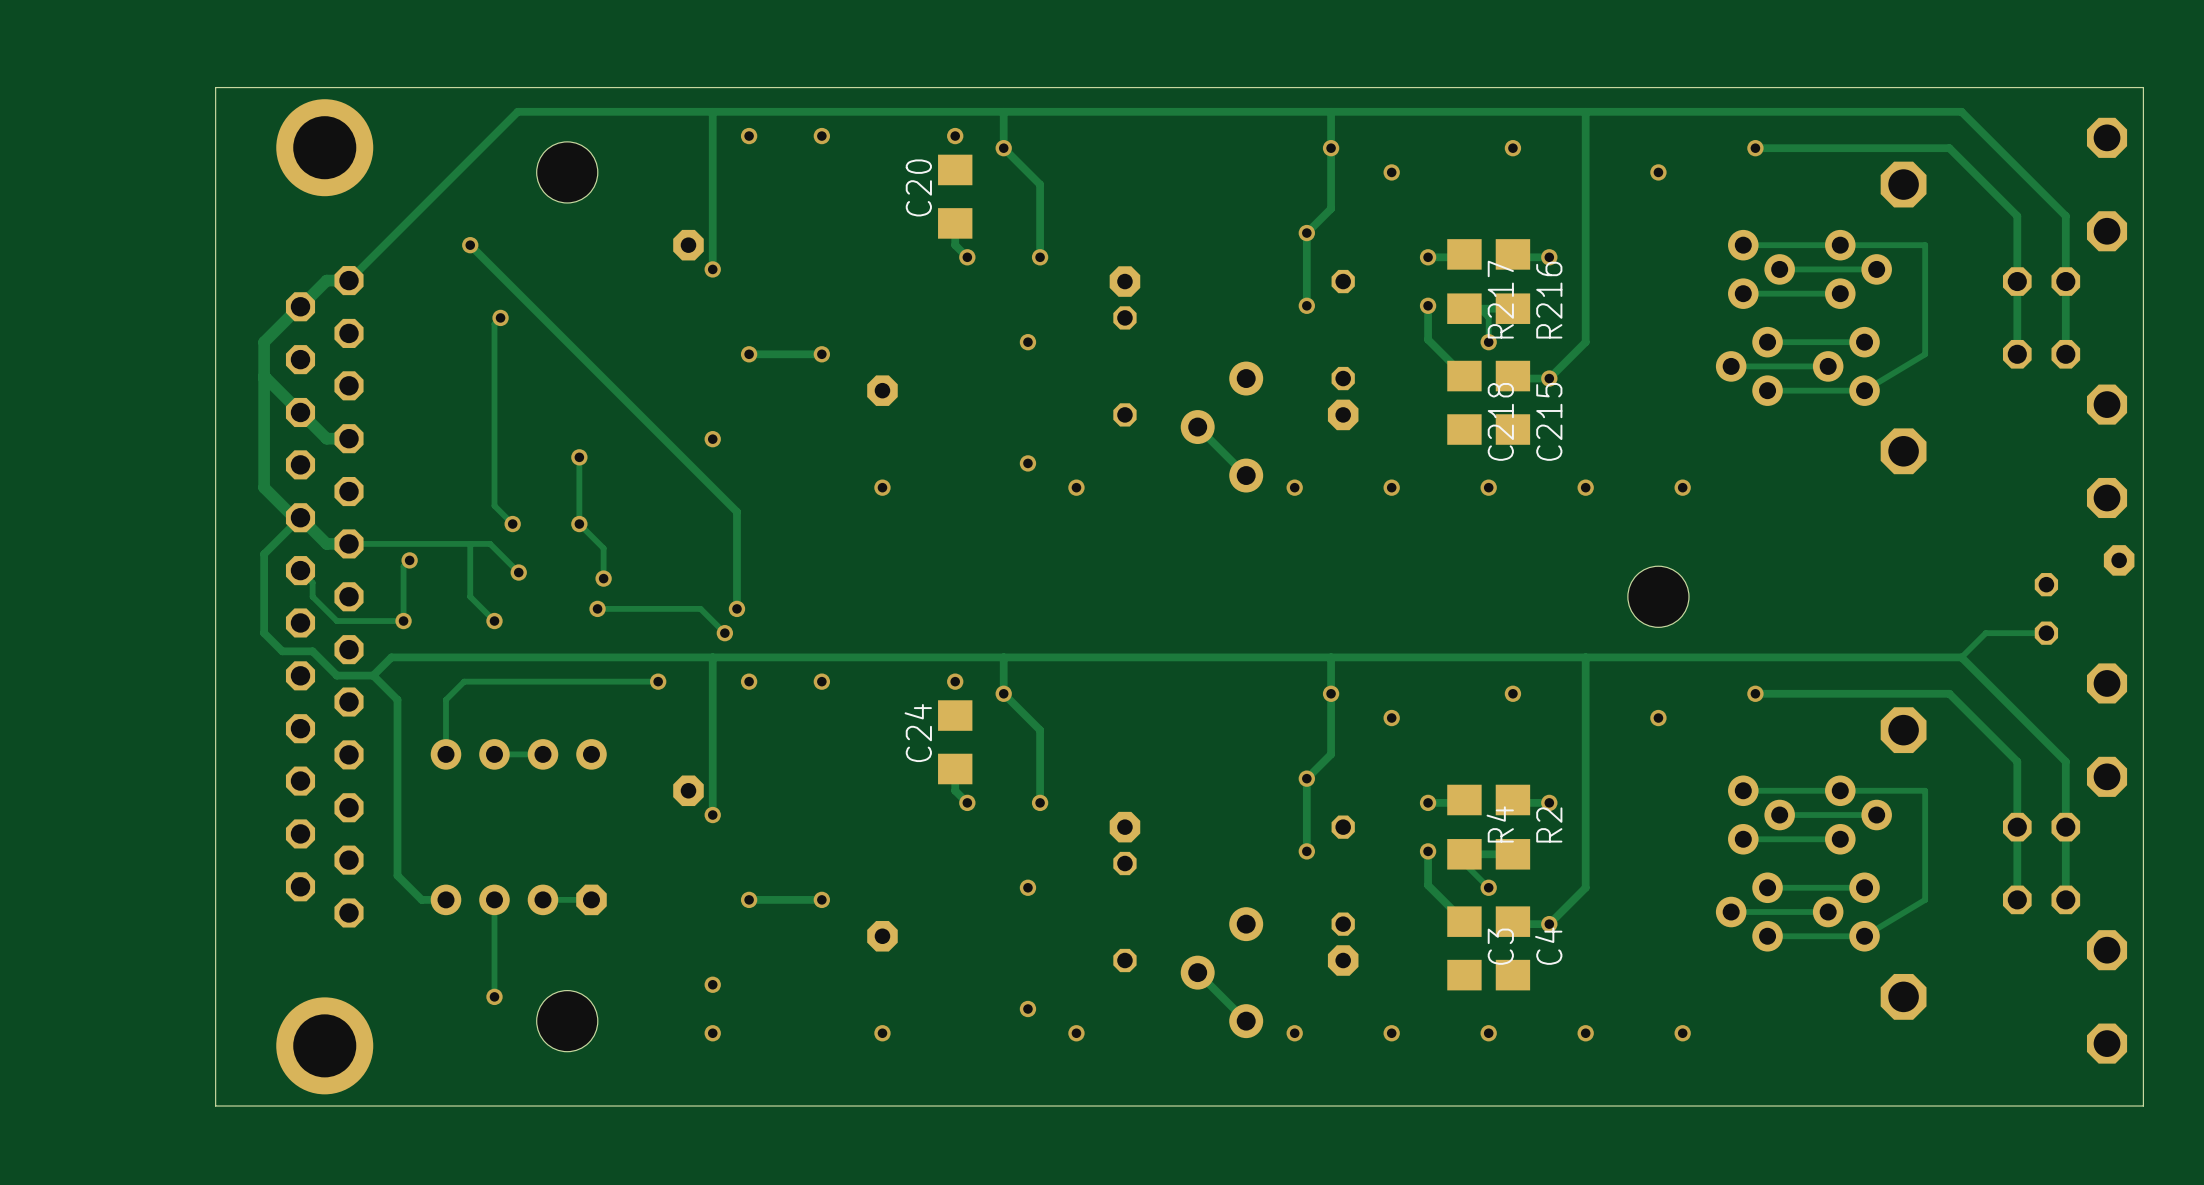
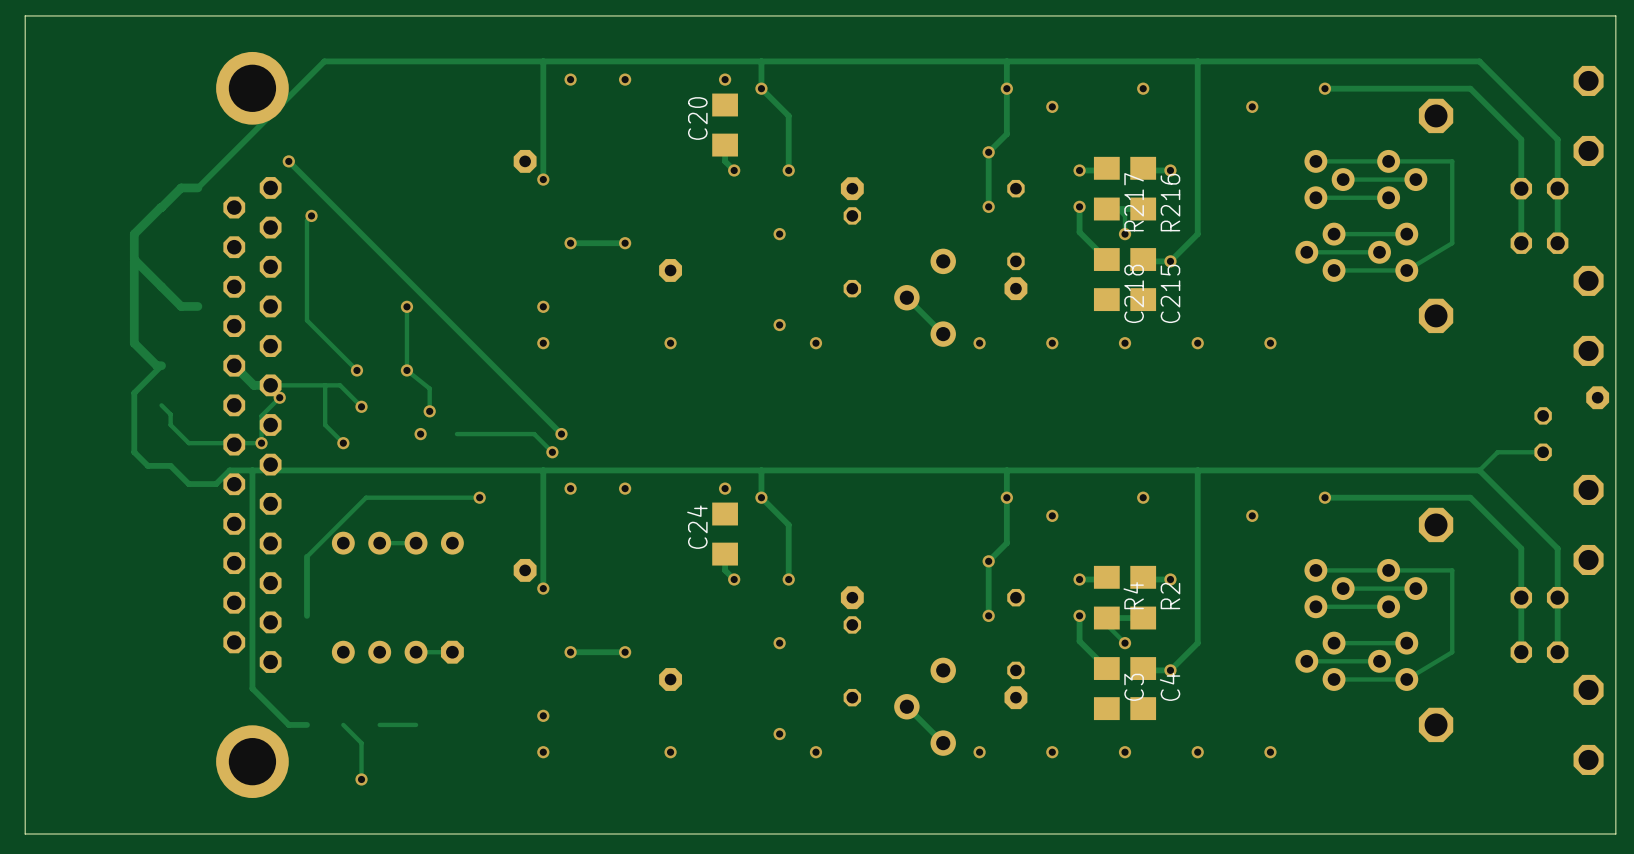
board edge: (2143, 87) (215, 87) (215, 1106) (2143, 1106) -> (1615, 43) (1615, 15) (25, 15) (25, 834) (1615, 834) (1615, 806)
track: (517, 111) (349, 280) (326, 280) (264, 342) (264, 376) (326, 438) (349, 438) -> (397, 61) (324, 61) (197, 187) (181, 187) (134, 234) (134, 259) (181, 306) (197, 306)
hole: (567, 172) -> none
via: none -> (288, 161)
track: (470, 245) (736, 511) (736, 608) -> (288, 161) (561, 434)
via: (470, 245) -> none
track: none -> (311, 215) (306, 220) (306, 320) (356, 370)
via: none -> (311, 215)
track: (500, 317) (494, 323) (494, 505) (512, 524) -> none
via: (500, 317) -> none
track: (265, 377) (264, 487) (294, 517) (300, 517) (264, 554) (264, 633) (282, 651) (312, 651) (336, 675) (373, 675) -> none
track: none -> (406, 306) (406, 370) (429, 388) (429, 411)
via: none -> (406, 306)
track: (579, 457) (579, 524) (603, 548) (603, 578) -> none
via: (579, 457) -> none
via: none -> (543, 343)
via: none -> (356, 370)
via position: (512, 524) -> (406, 370)
via: (579, 524) -> none
track: (441, 543) (490, 543) (518, 572) -> (340, 385) (361, 406)
track: (470, 543) (470, 596) (494, 621) -> (325, 385) (325, 424) (343, 443)
track: none -> (279, 397) (261, 415) (261, 443) (188, 443) (170, 424) (170, 414) (161, 405)
via: none -> (279, 397)
track: (409, 560) (403, 566) (403, 621) (336, 621) (312, 596) (312, 582) (300, 570) -> none
via: (409, 560) -> none
via: none -> (361, 406)
via: (518, 572) -> none
via: none -> (429, 411)
via: (603, 578) -> none
hole: (1658, 596) -> none
via: none -> (420, 434)
via: (597, 608) -> none
via: none -> (261, 443)
via: (403, 621) -> none
via: none -> (343, 443)
via: (494, 621) -> none
track: none -> (252, 470) (252, 688) (288, 724) (306, 724)
track: (391, 657) (373, 675) -> (302, 470) (229, 470) (216, 484) (188, 484) (170, 465) (147, 465) (134, 452) (134, 392) (161, 365) (156, 365) (134, 343) (135, 260)
track: (373, 675) (397, 699) (397, 772) -> (479, 497) (366, 497) (306, 556)
track: (658, 681) (464, 681) (445, 699) (445, 754) -> none
via position: (658, 681) -> (479, 497)
track: (397, 851) (397, 875) (421, 899) (445, 899) -> none
track: (494, 899) (494, 996) -> (416, 724) (379, 724)
track: none -> (343, 724) (361, 743) (361, 779)
via position: (494, 996) -> (361, 779)
hole: (567, 1021) -> none

